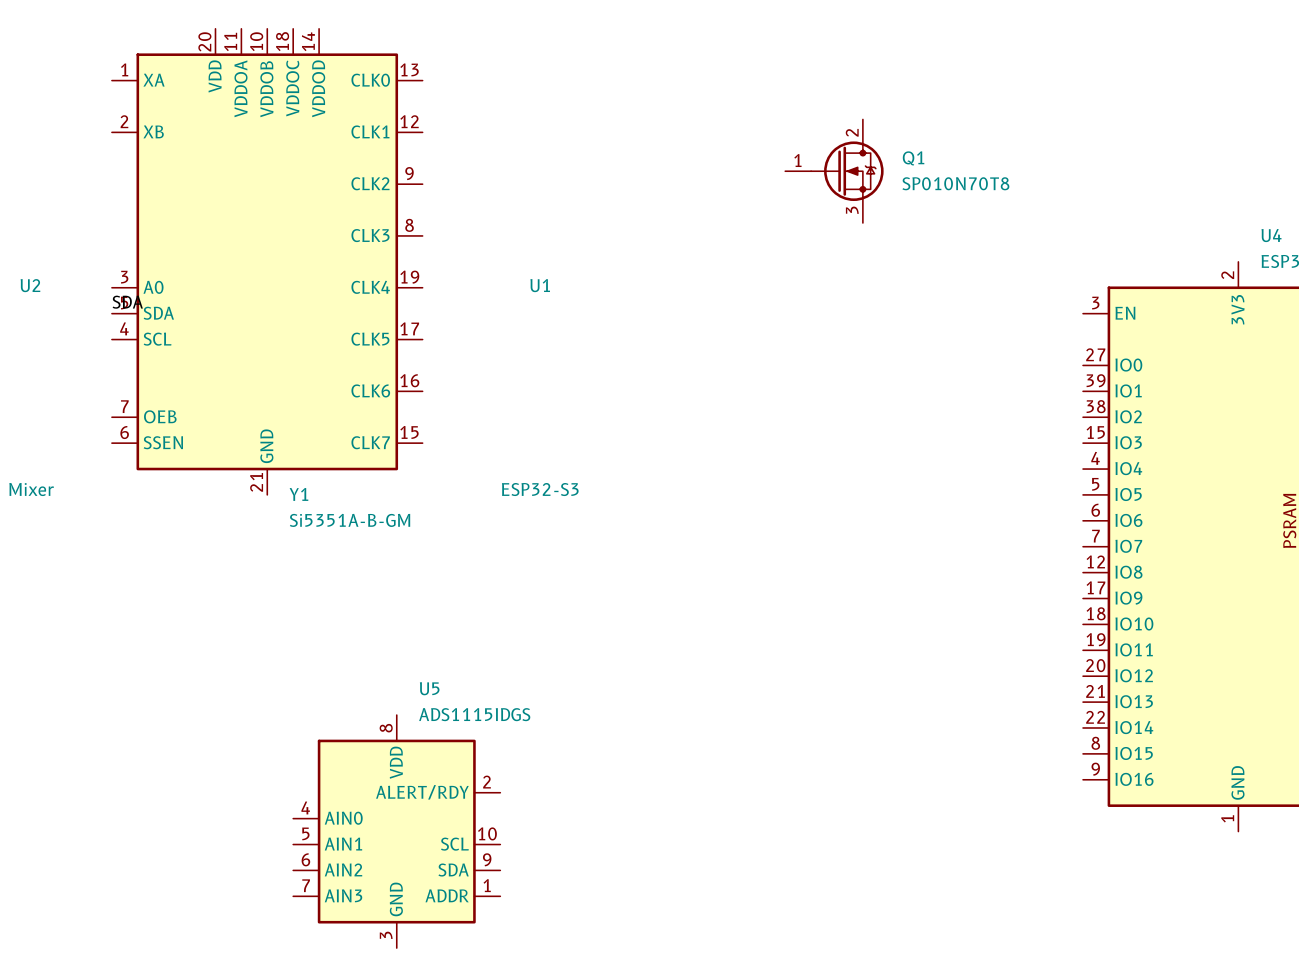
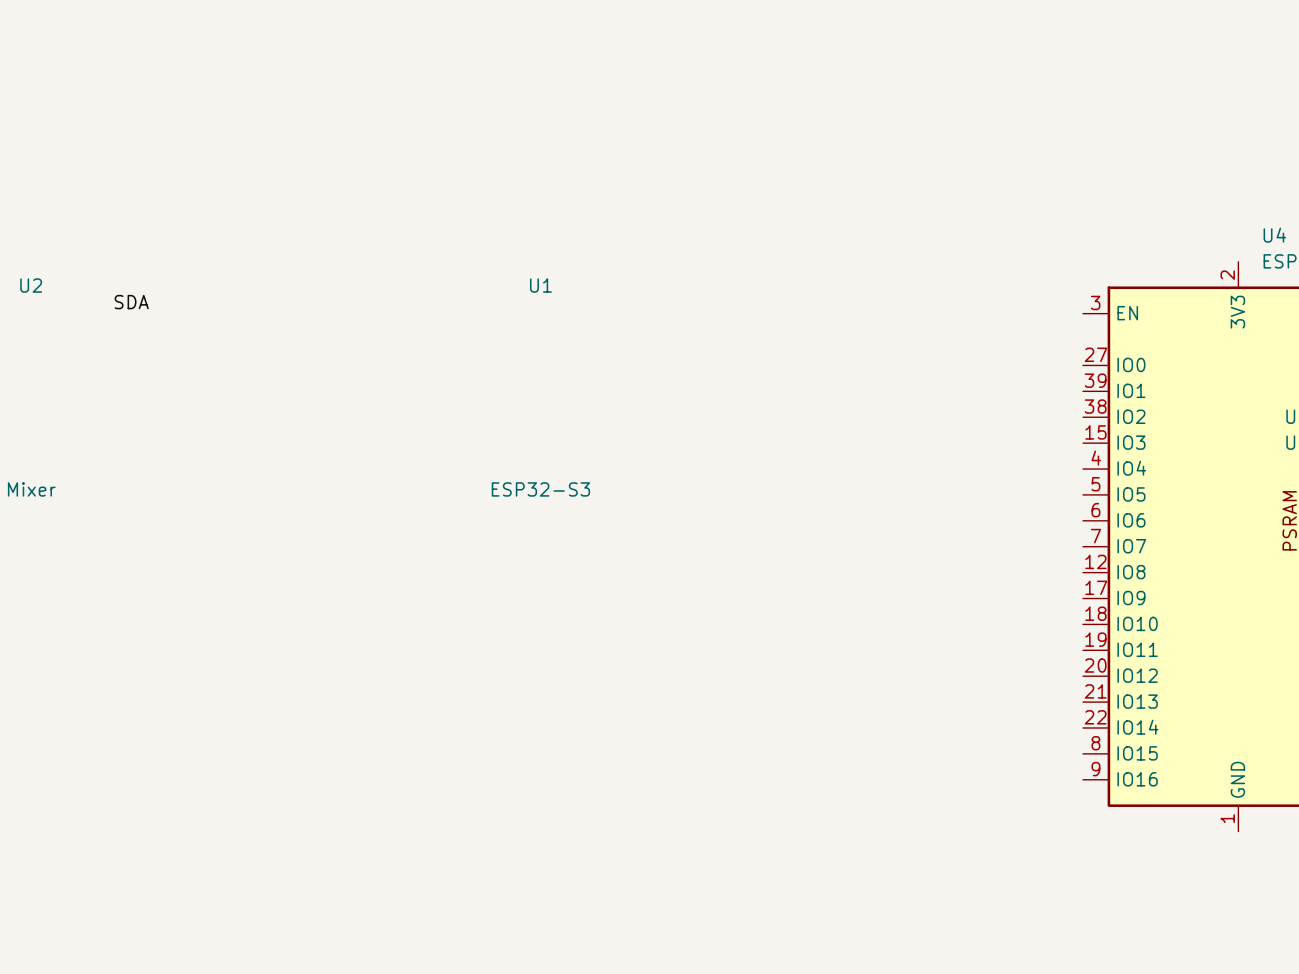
Q1: SP010N70T8 (834, 171) -> none
Y1: Si5351A-B-GM (267, 261) -> none
U5: ADS1115IDGS (396, 831) -> none

